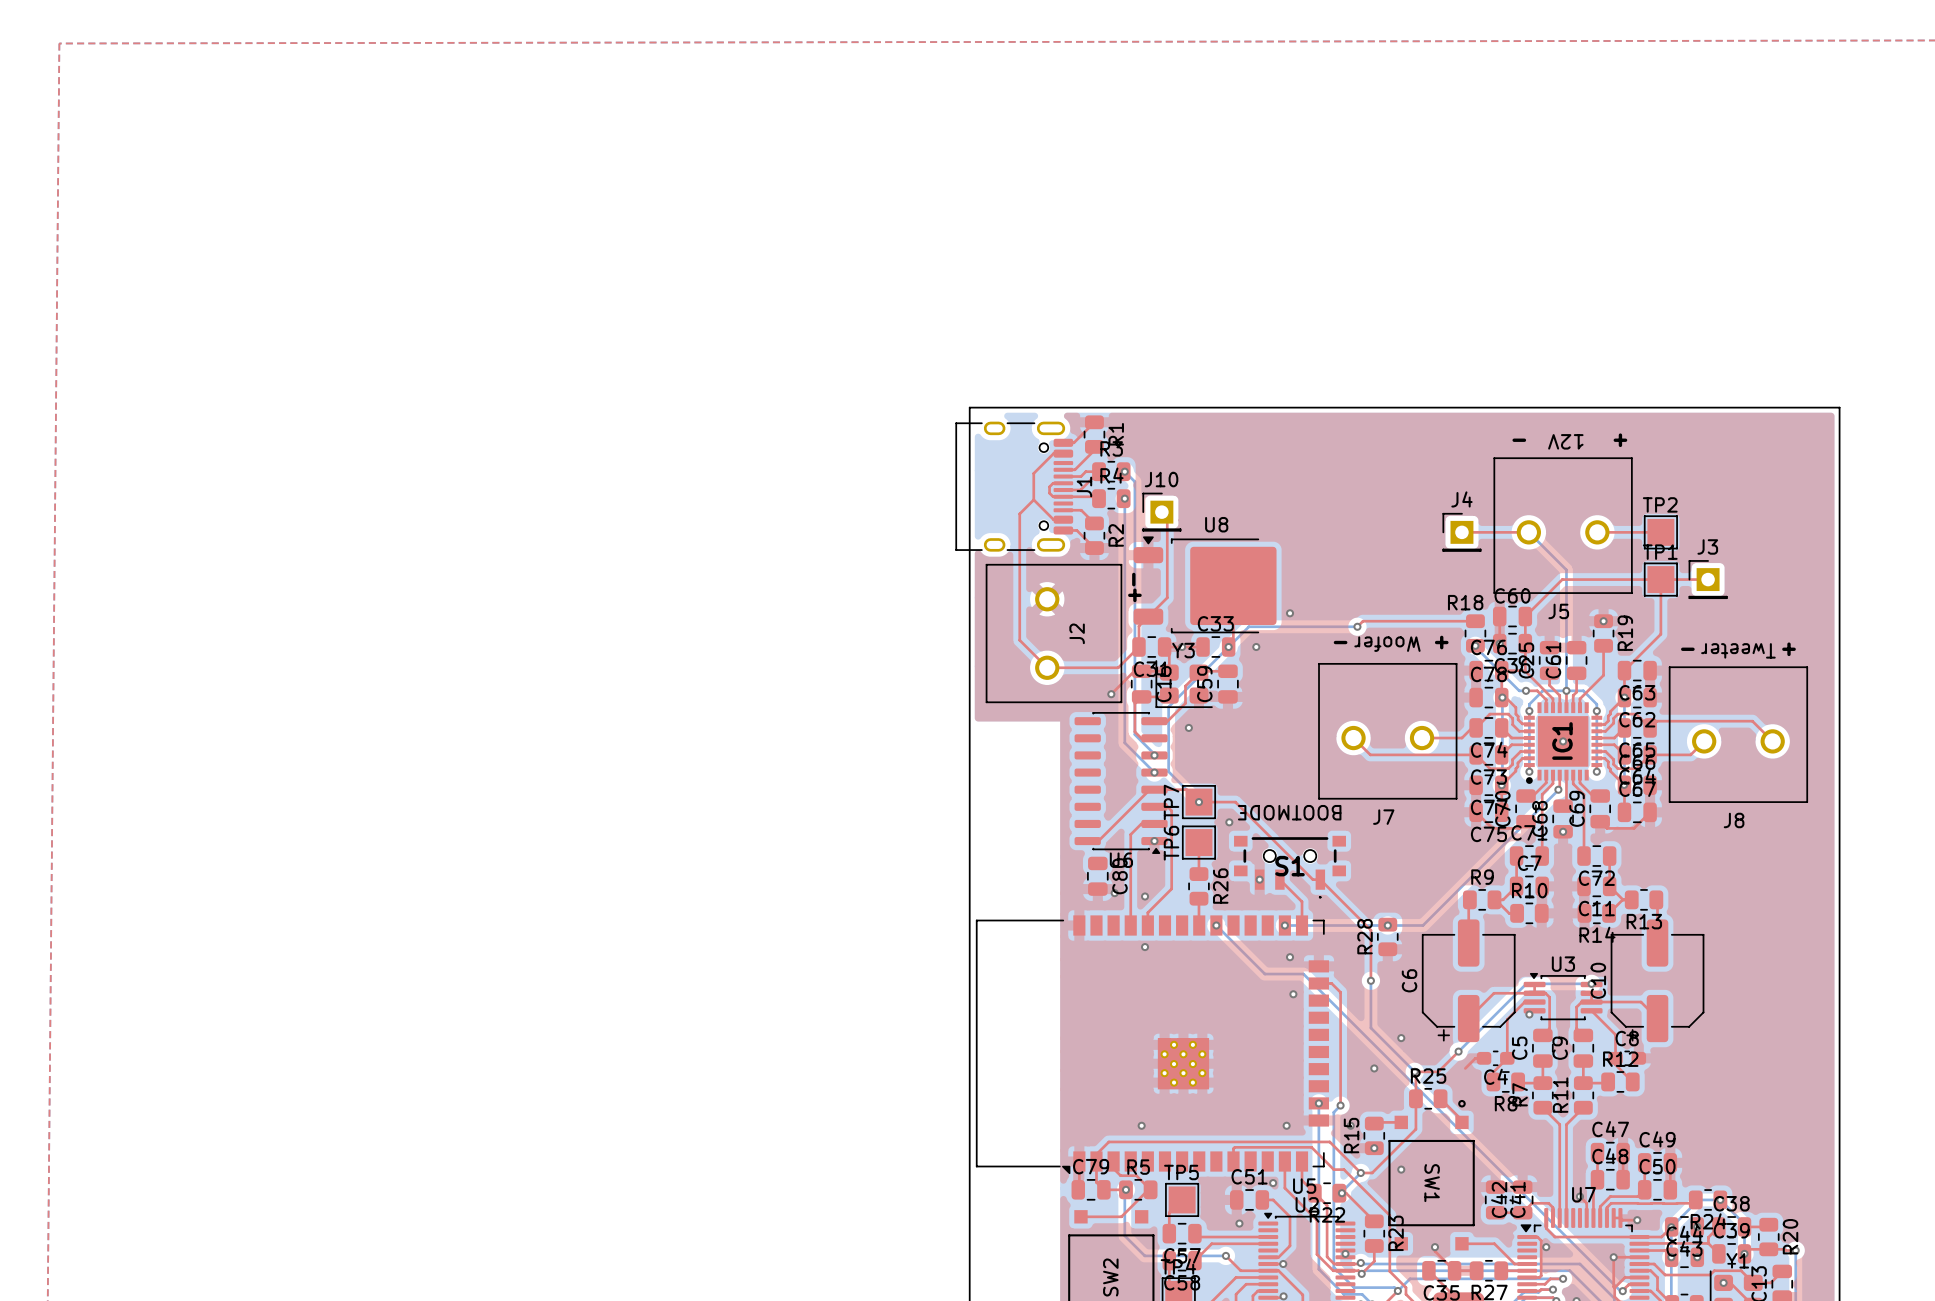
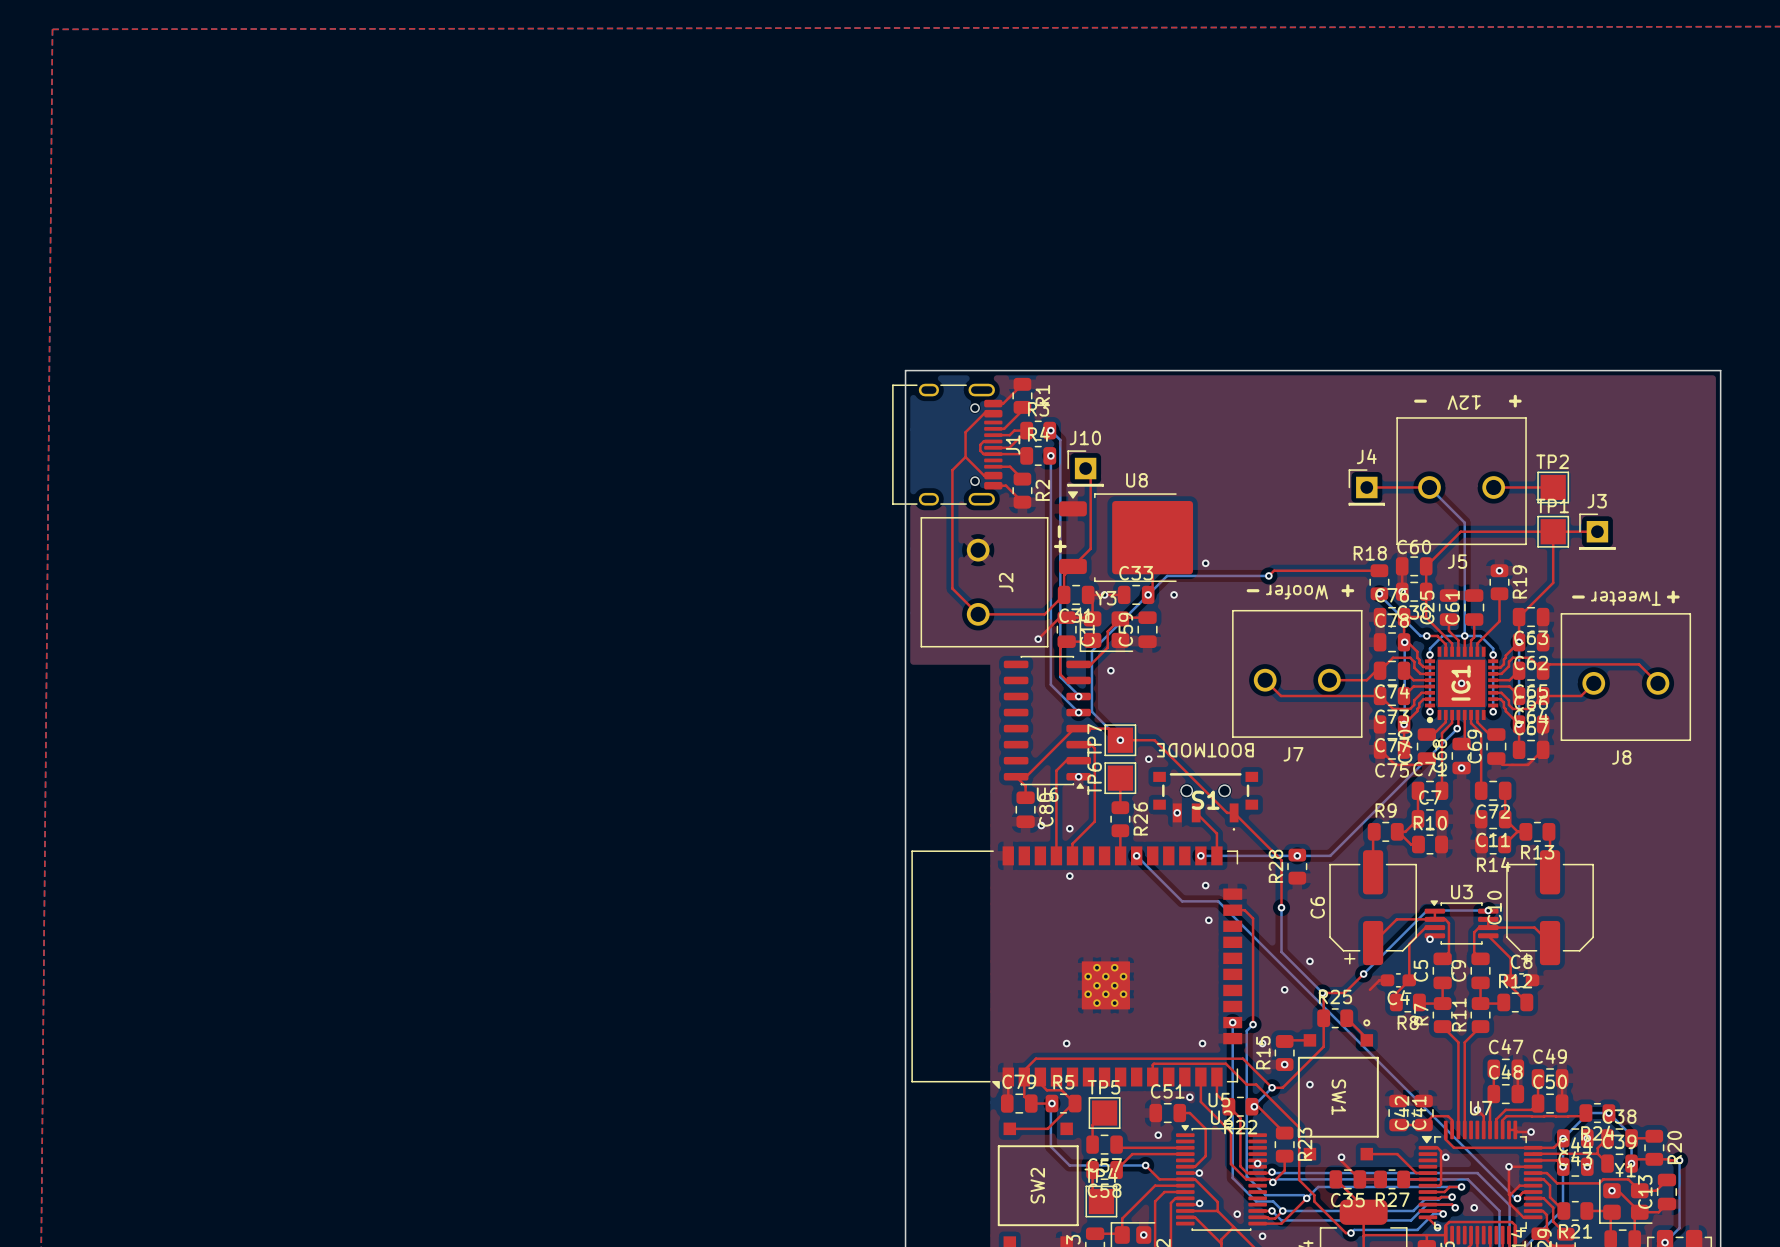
top track: none -> (1016, 776) (1025, 786) (1025, 797)

